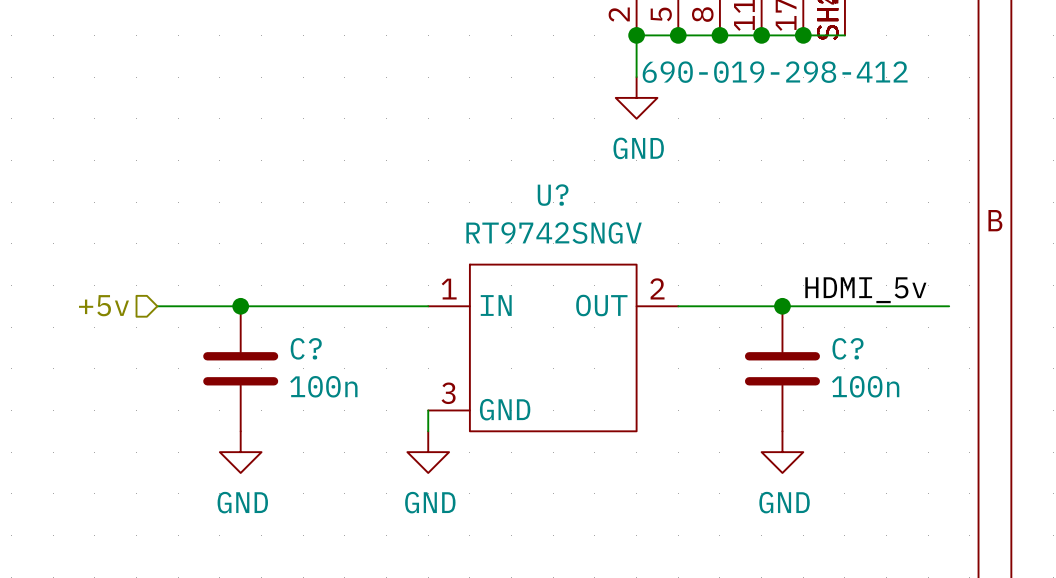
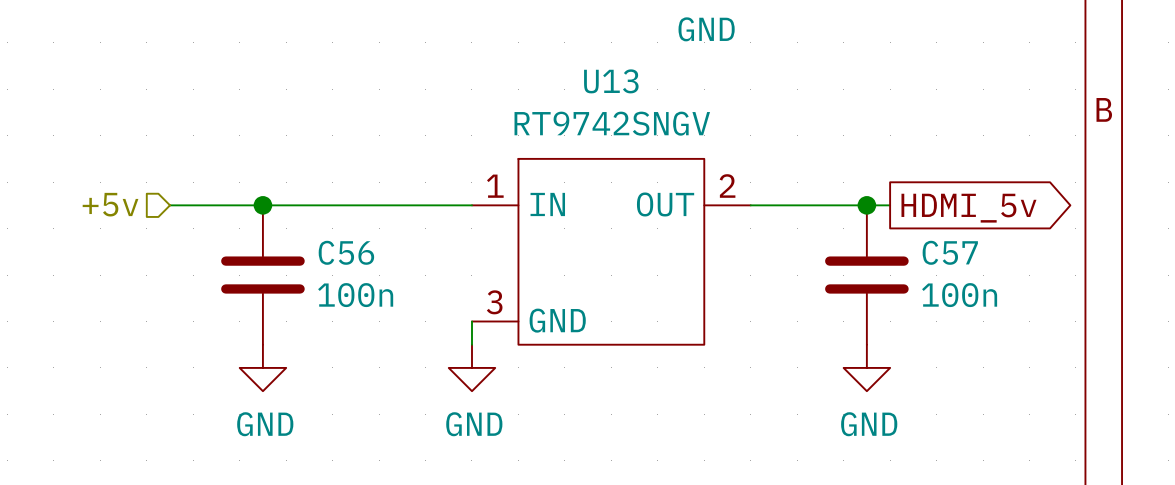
U? name: U? (553, 195) -> U13 (611, 81)
label: HDMI_5v (865, 290) -> none
wire: (803, 306) (949, 306) -> none
global label: none -> HDMI_5v (968, 208)
C? name: C? (306, 348) -> C56 (346, 252)
C? name: C? (848, 348) -> C57 (950, 252)

